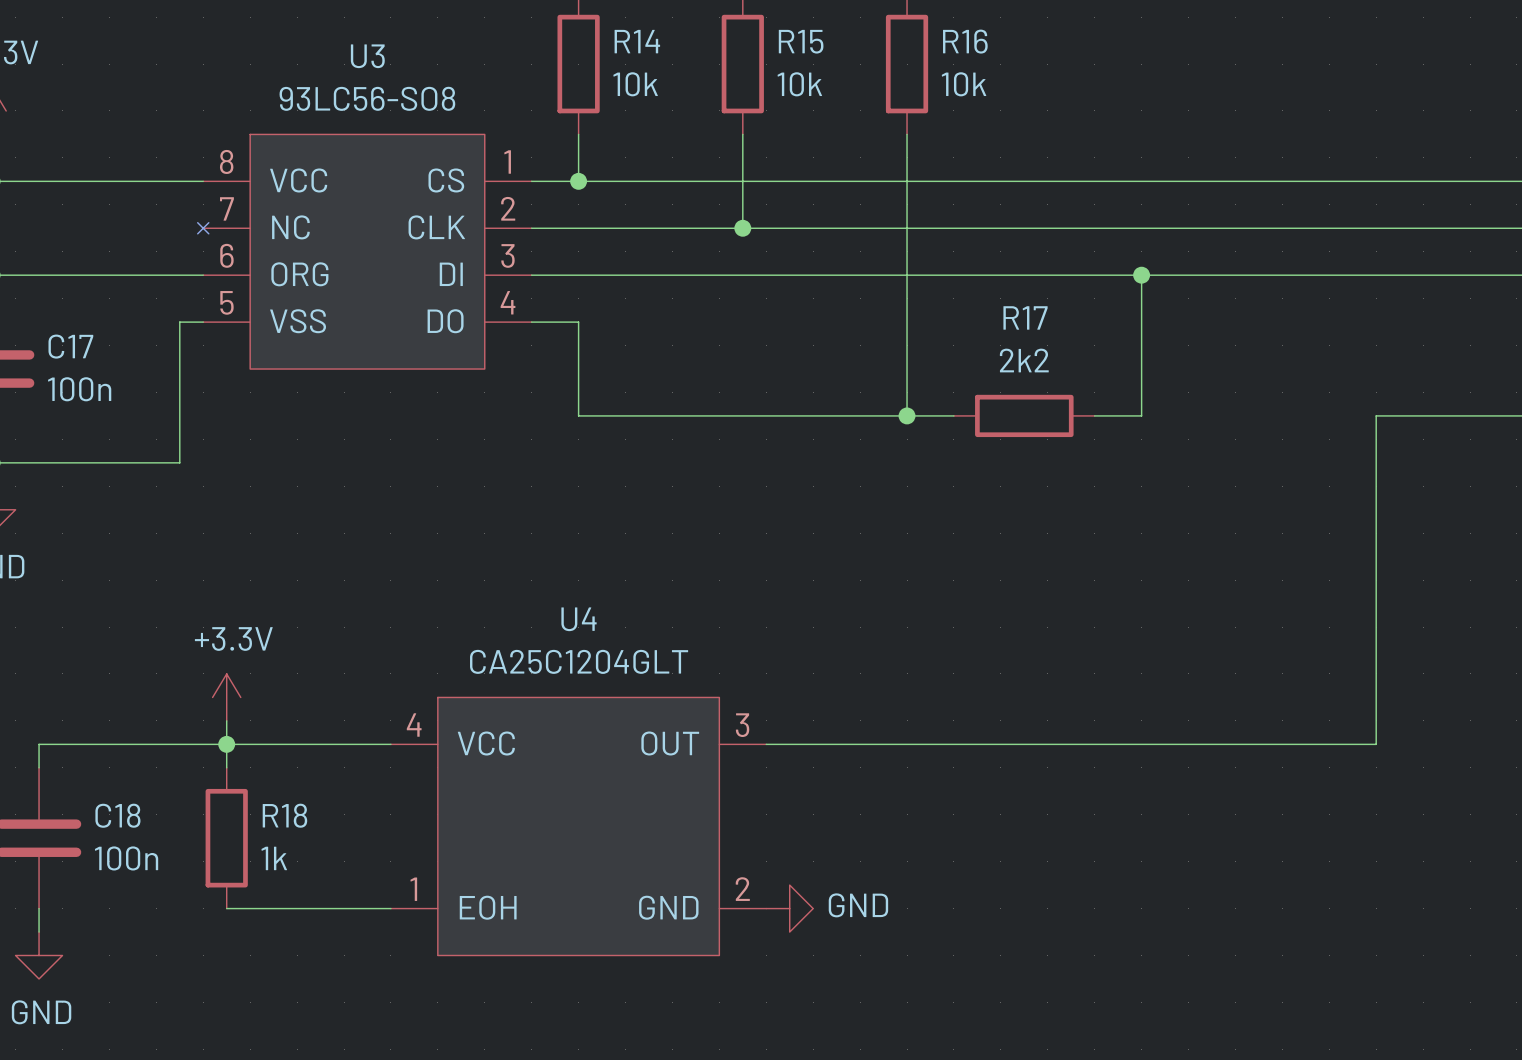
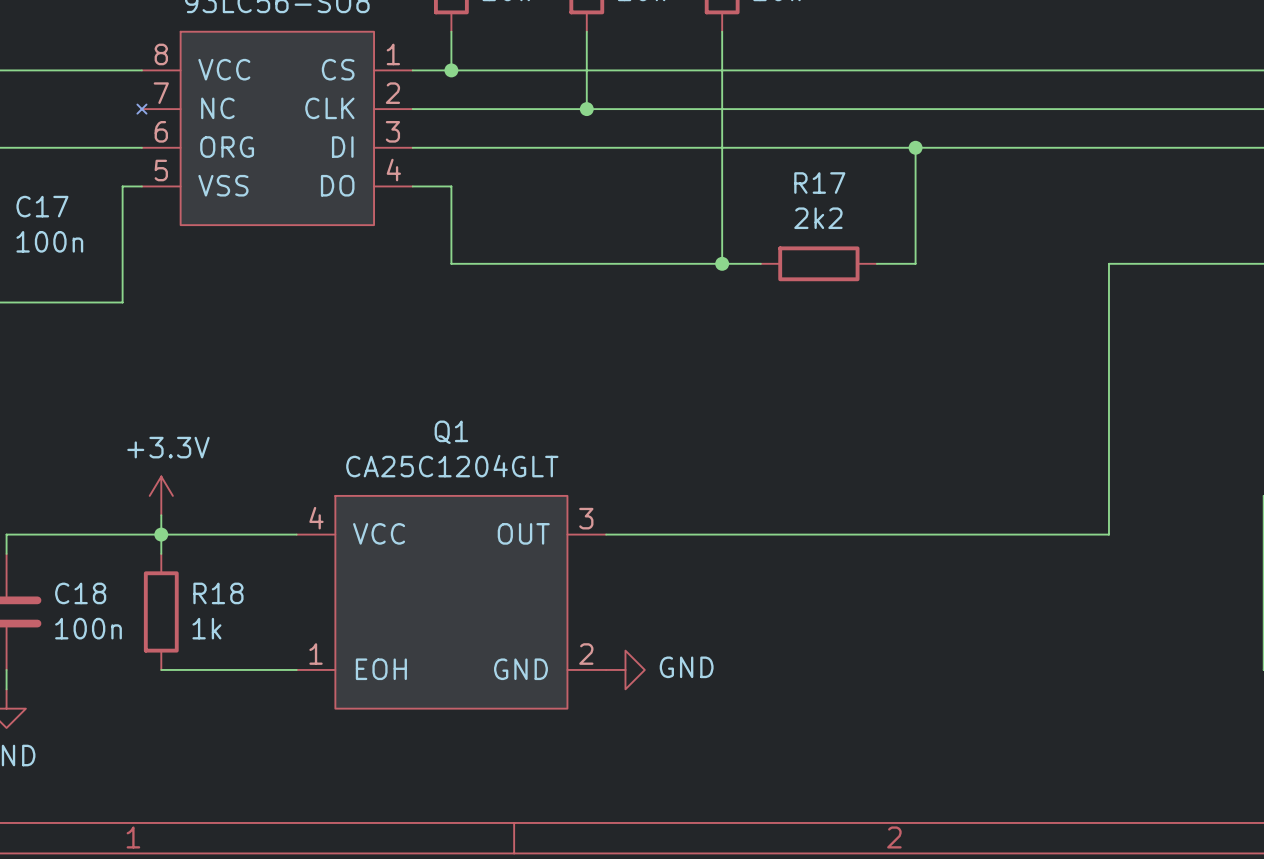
U4 name: U4 (579, 619) -> Q1 (451, 432)

